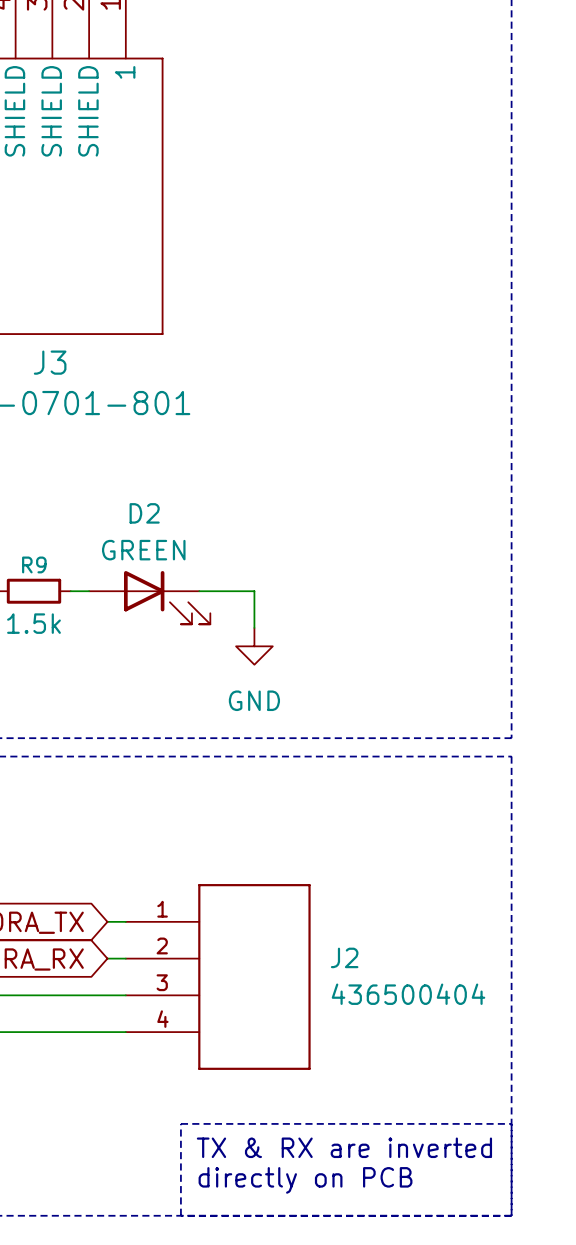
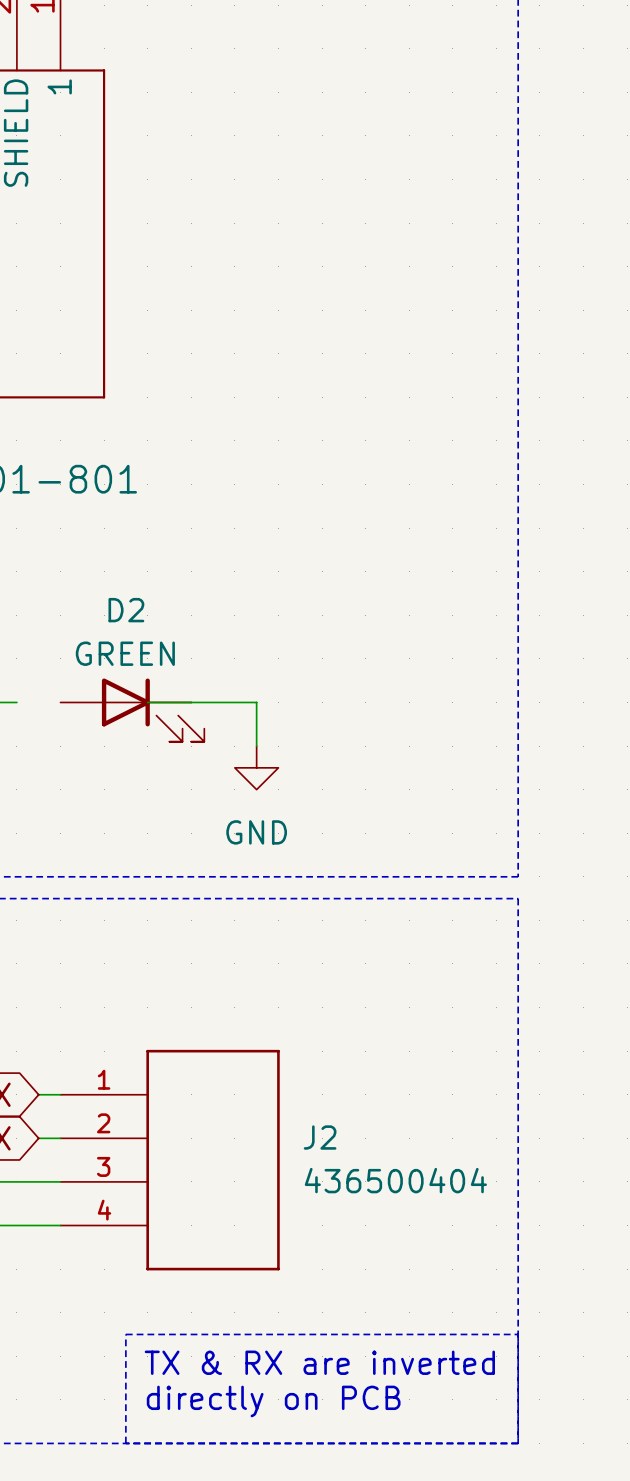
wire: (254, 591) (254, 627) -> (213, 702) (256, 702) (256, 746)
D2 position: (149, 597) -> (132, 710)
power symbol position: GND (254, 646) -> GND (256, 767)

